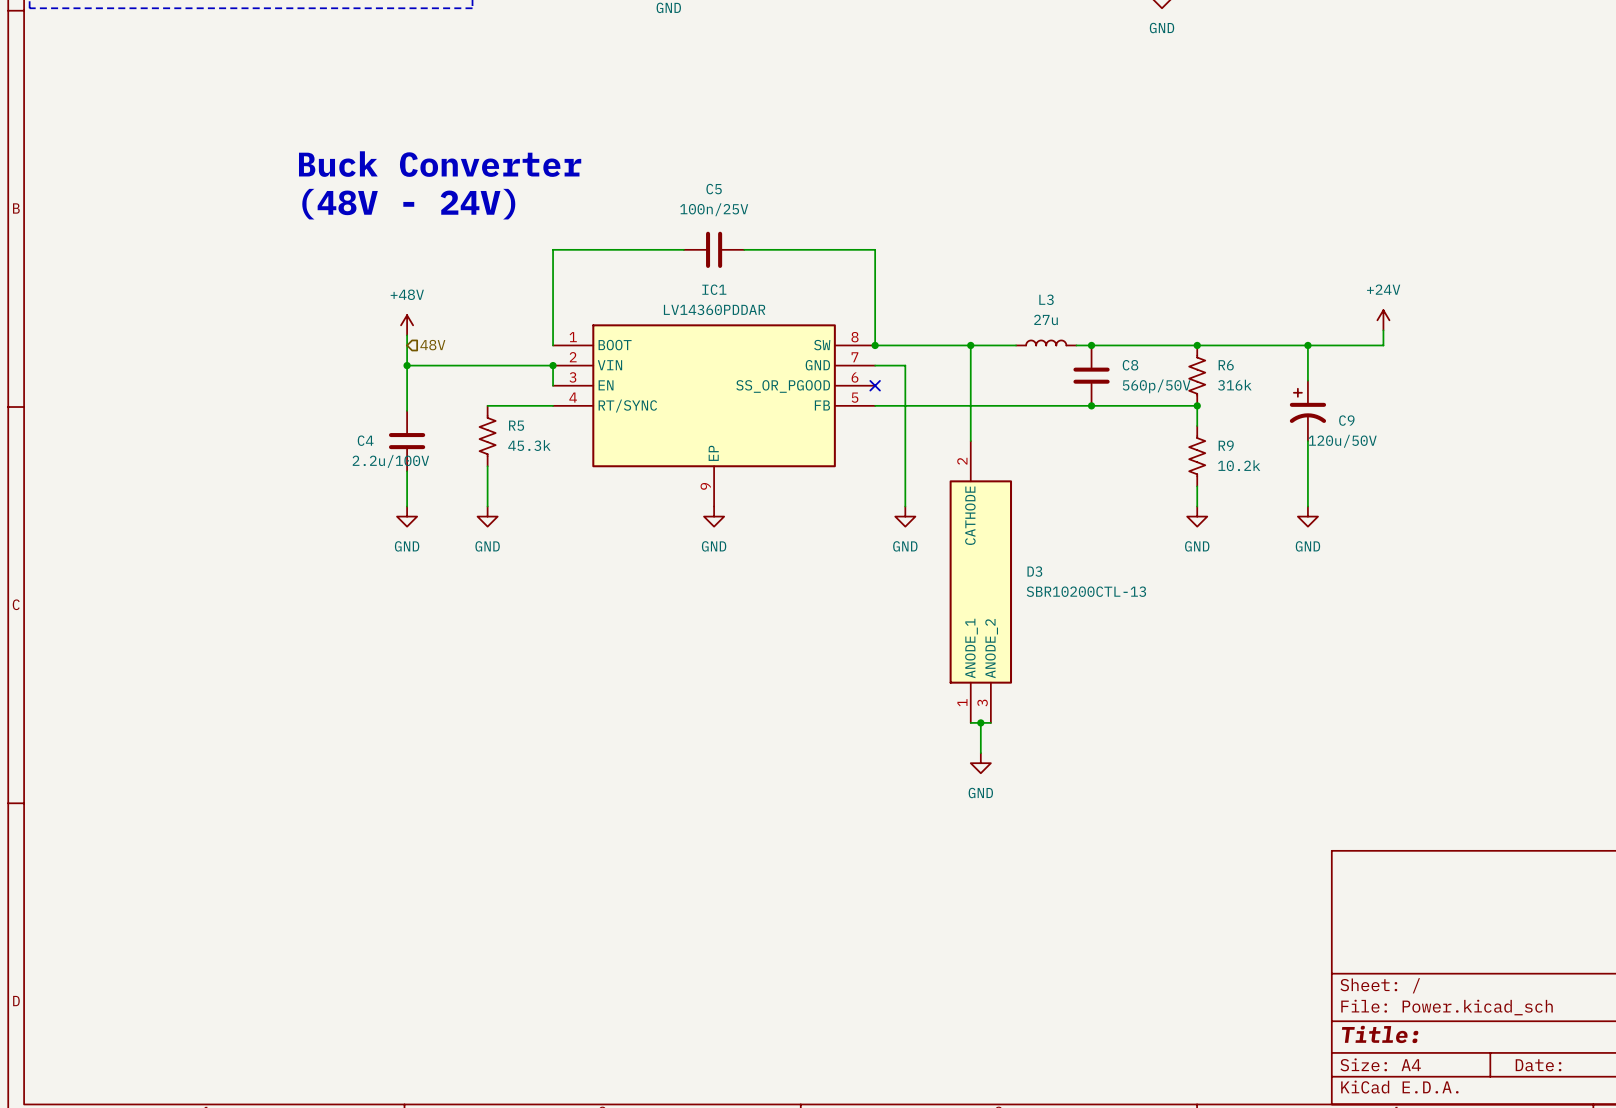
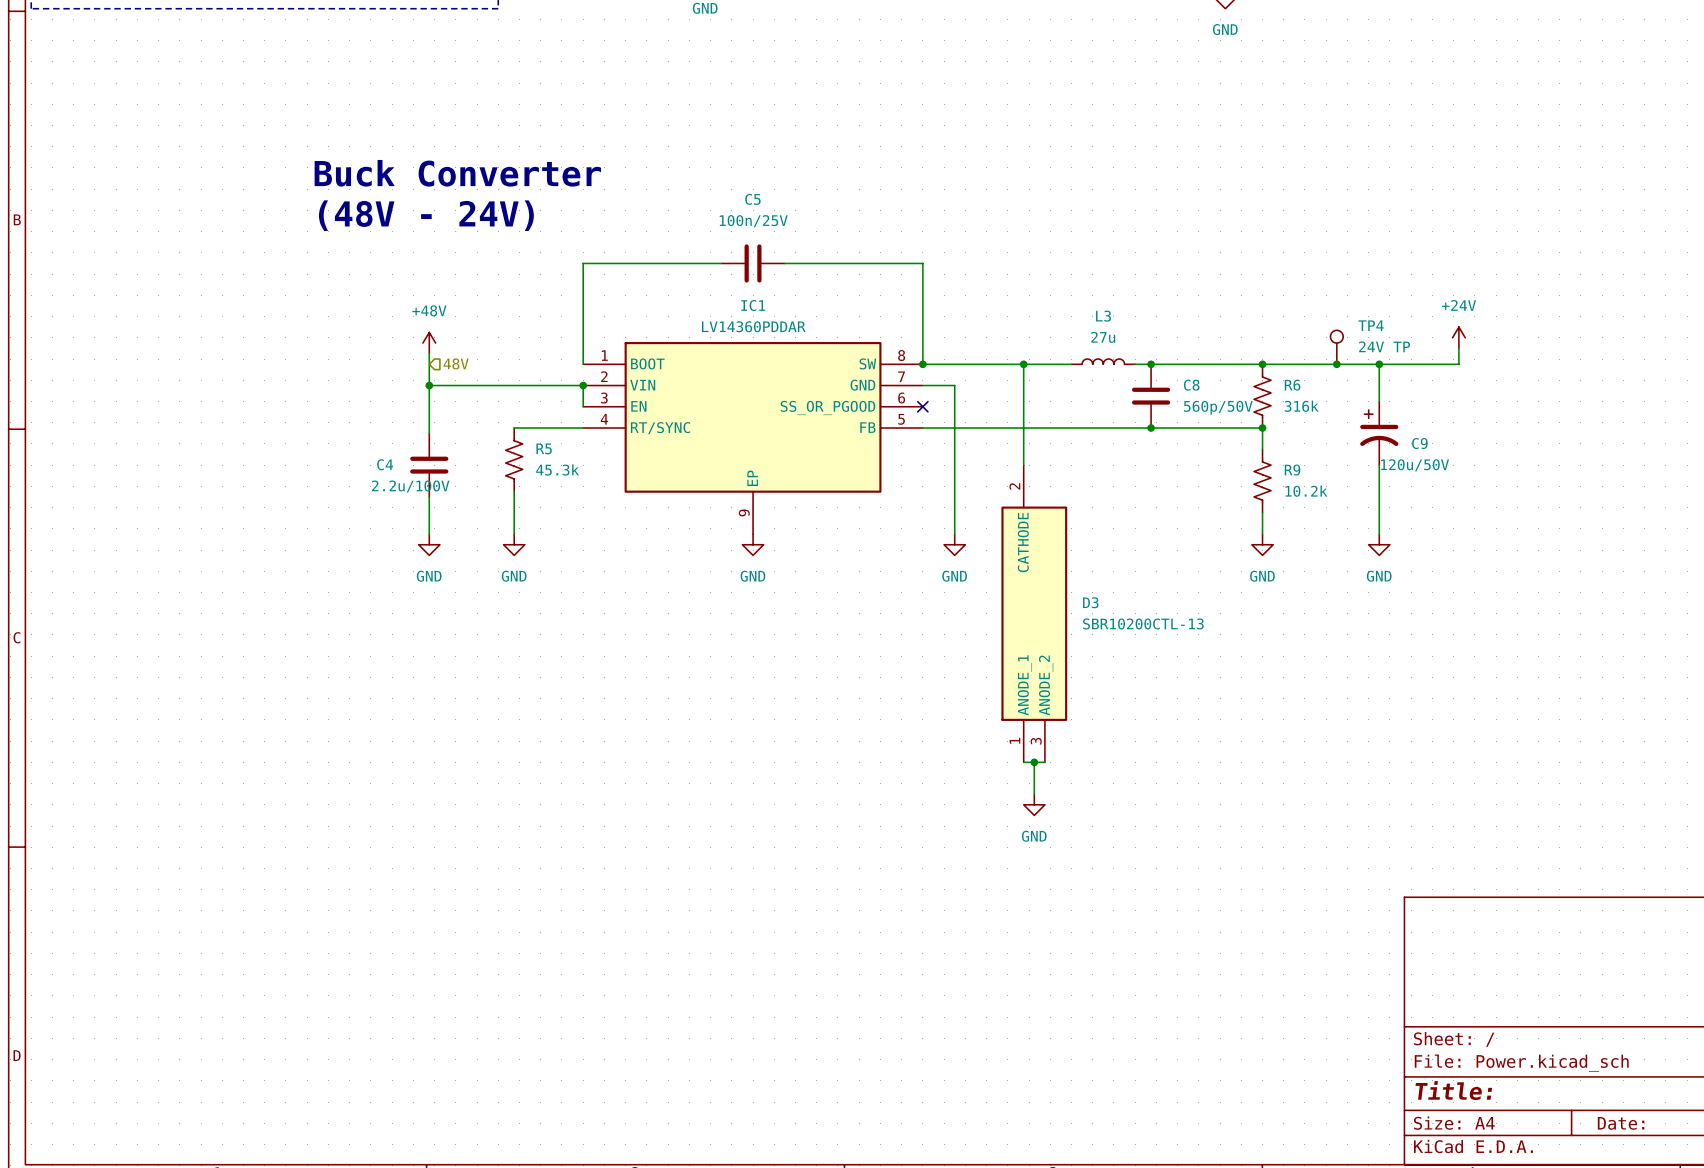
TP4: none -> 24V TP (1336, 347)
junction: none -> (1336, 364)

